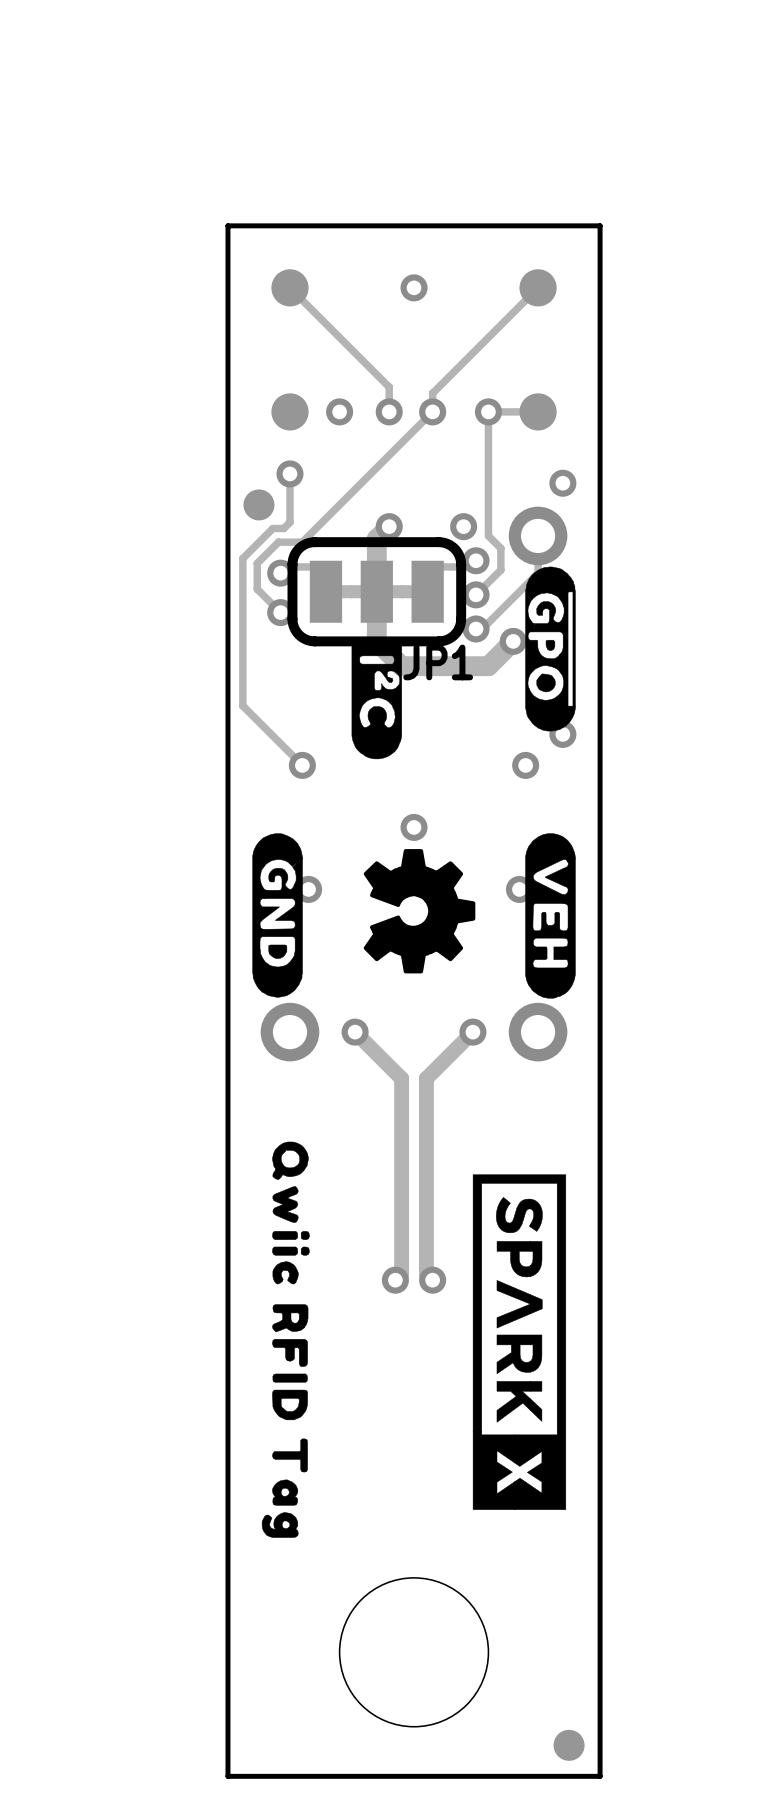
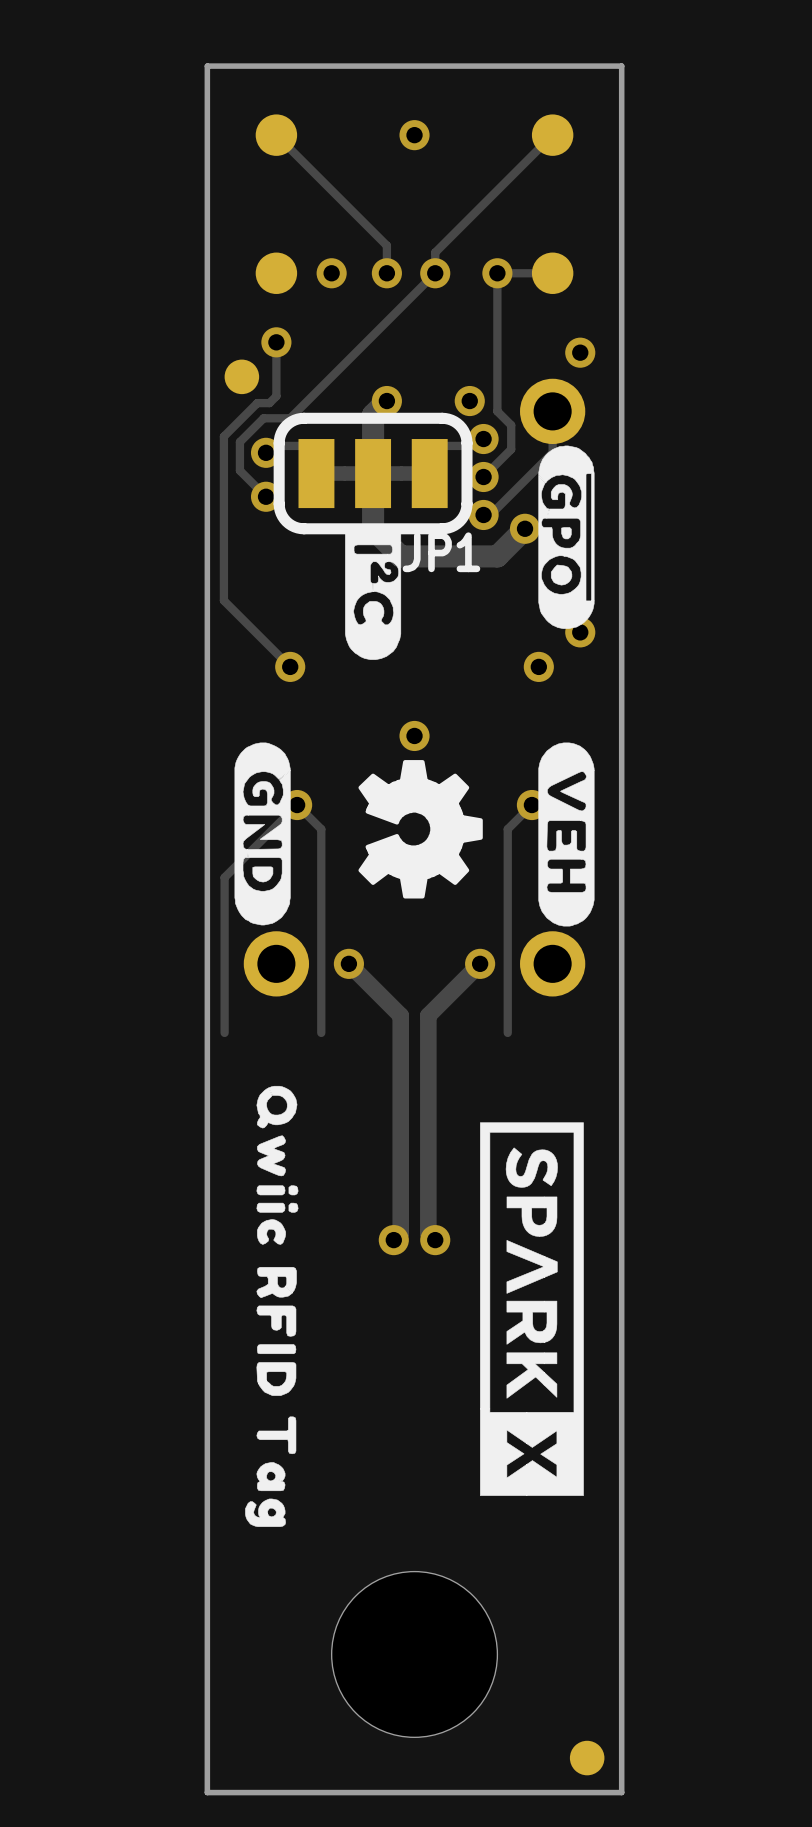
track: none -> (531, 805) (507, 829) (507, 1032)
track: none -> (321, 1032) (321, 829) (297, 805) (224, 877) (224, 1032)

